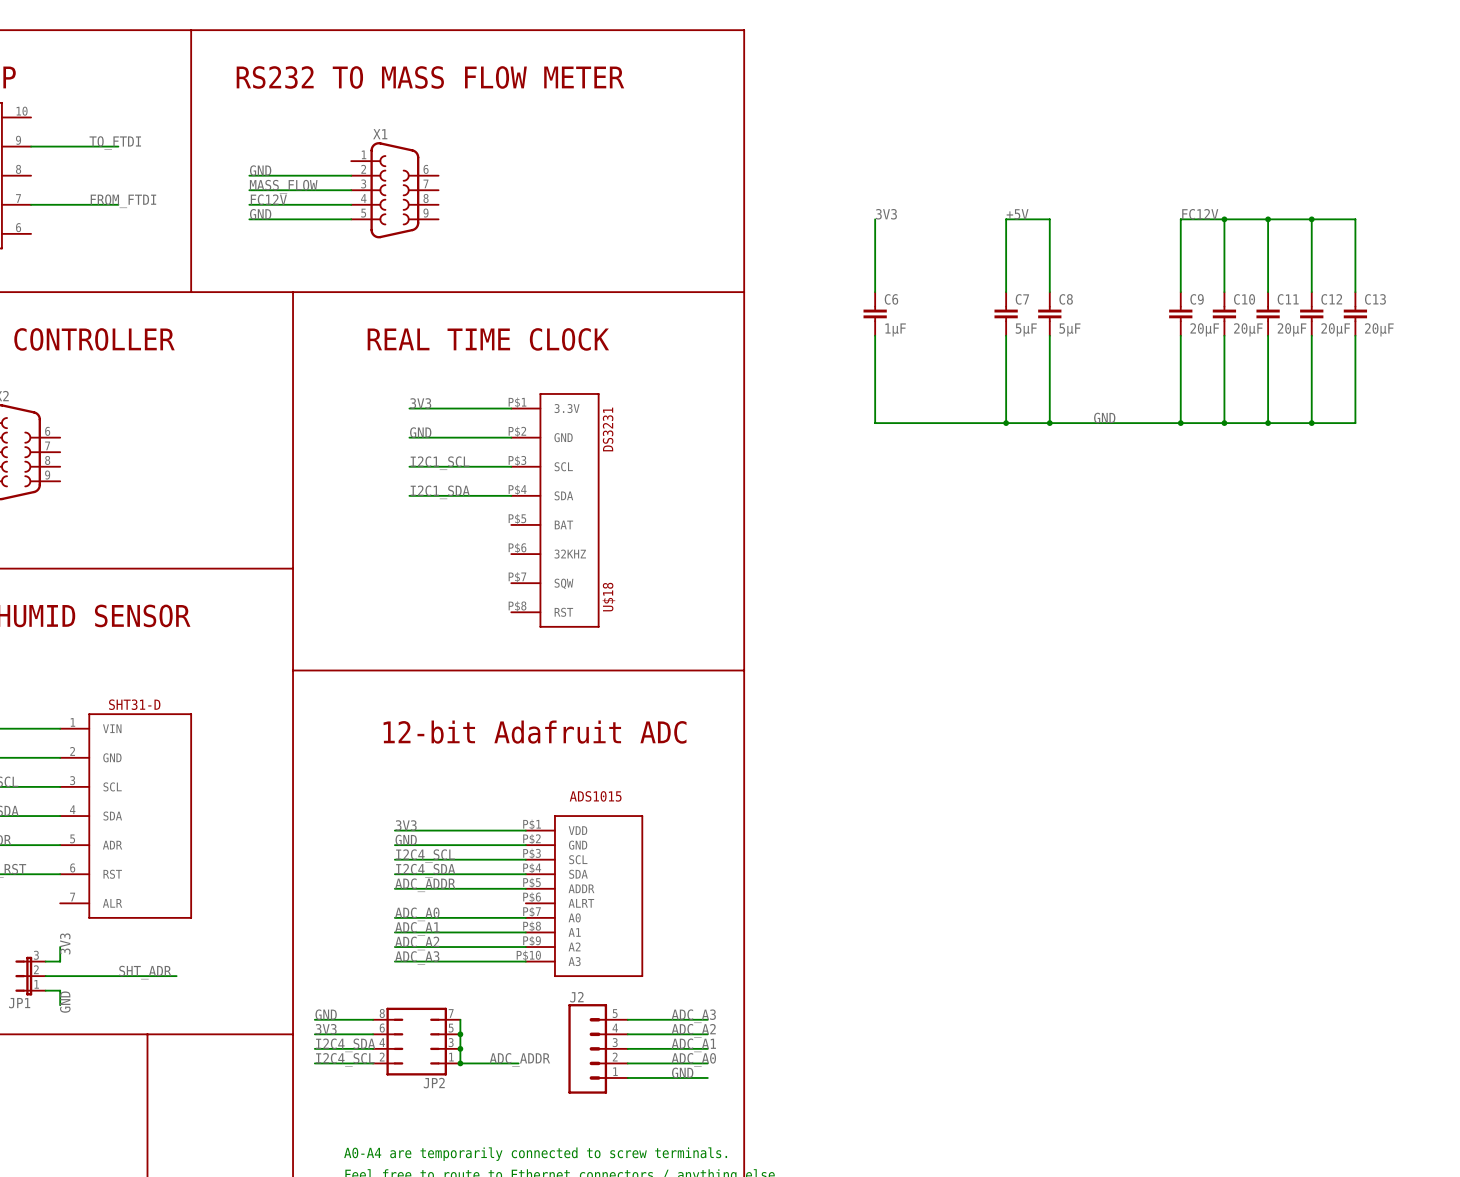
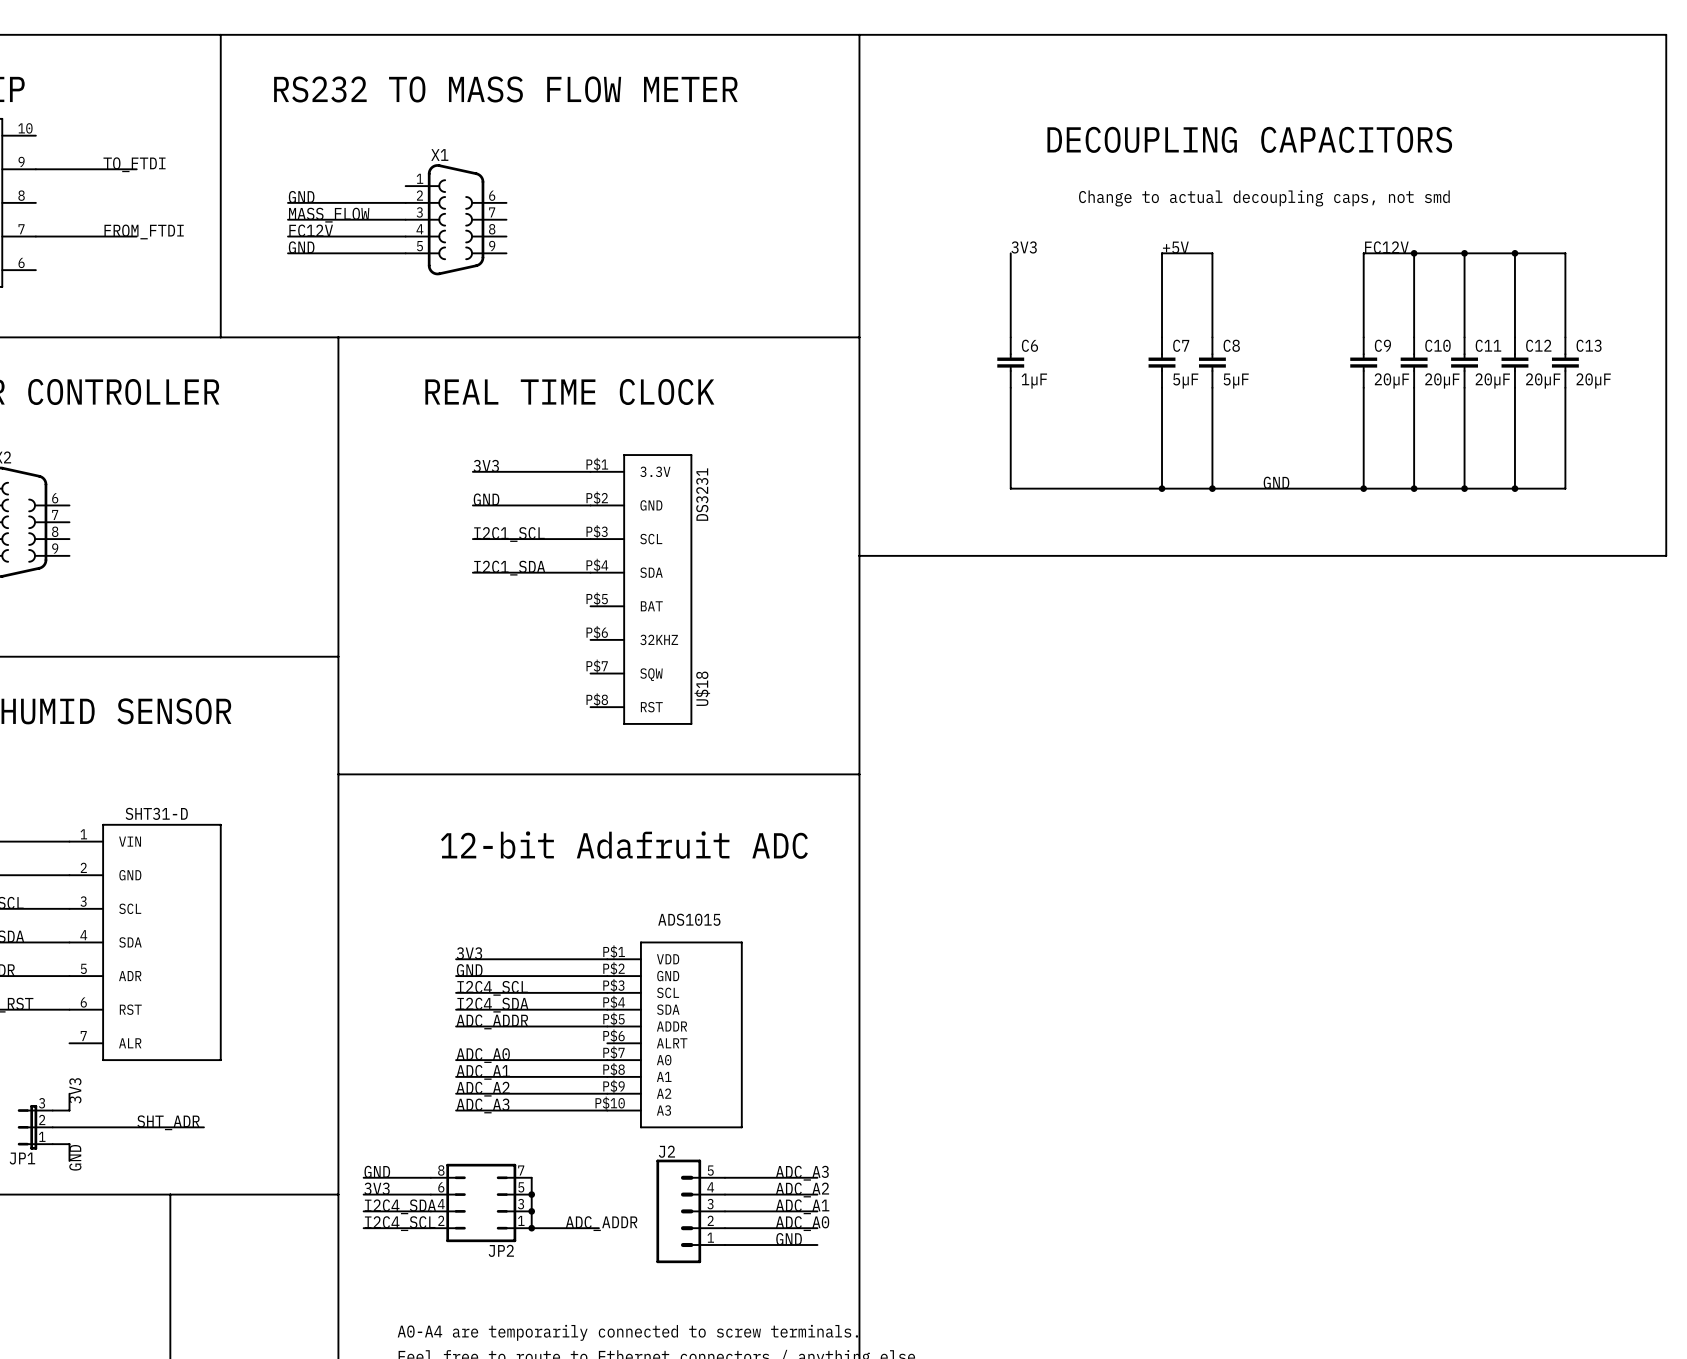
line: none -> (859, 34) (1666, 34) (1666, 555) (859, 555)
text: none -> DECOUPLING CAPACITORS (1249, 139)
text: none -> Change to actual decoupling caps, not smd (1264, 198)

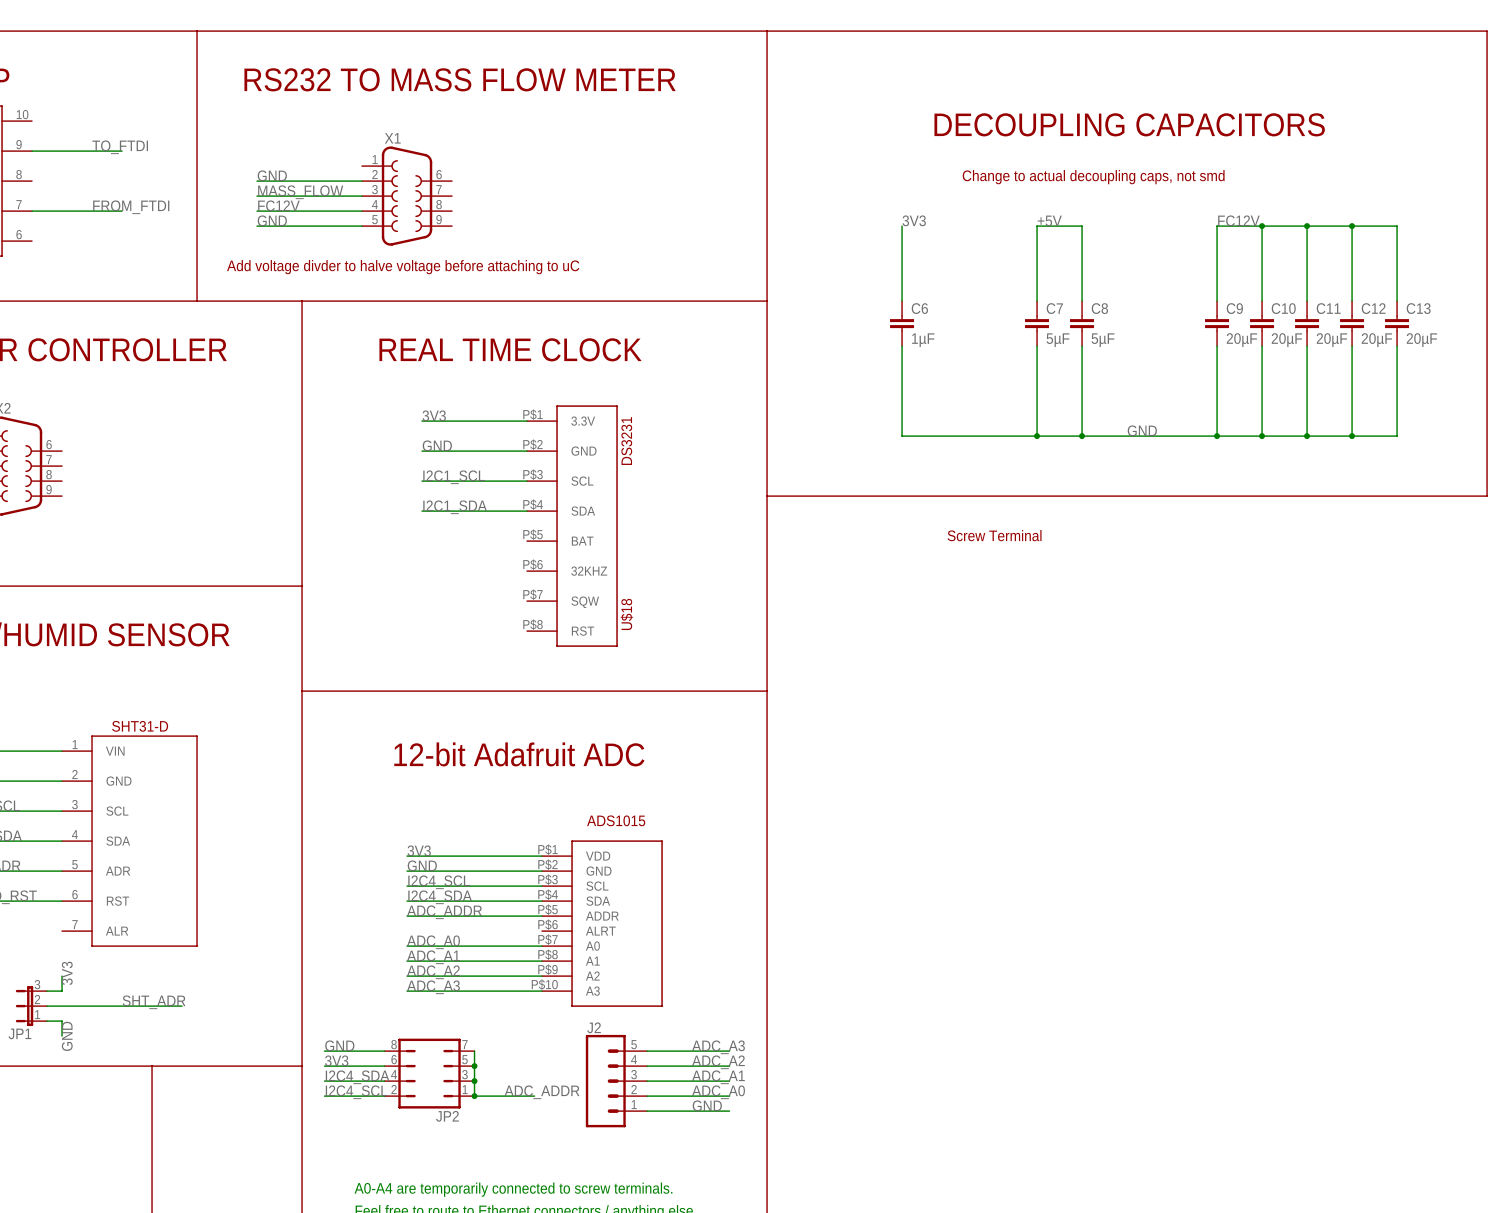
text: none -> Add voltage divder to halve voltage before attaching to uC (403, 267)
text: none -> Screw Terminal (994, 535)

